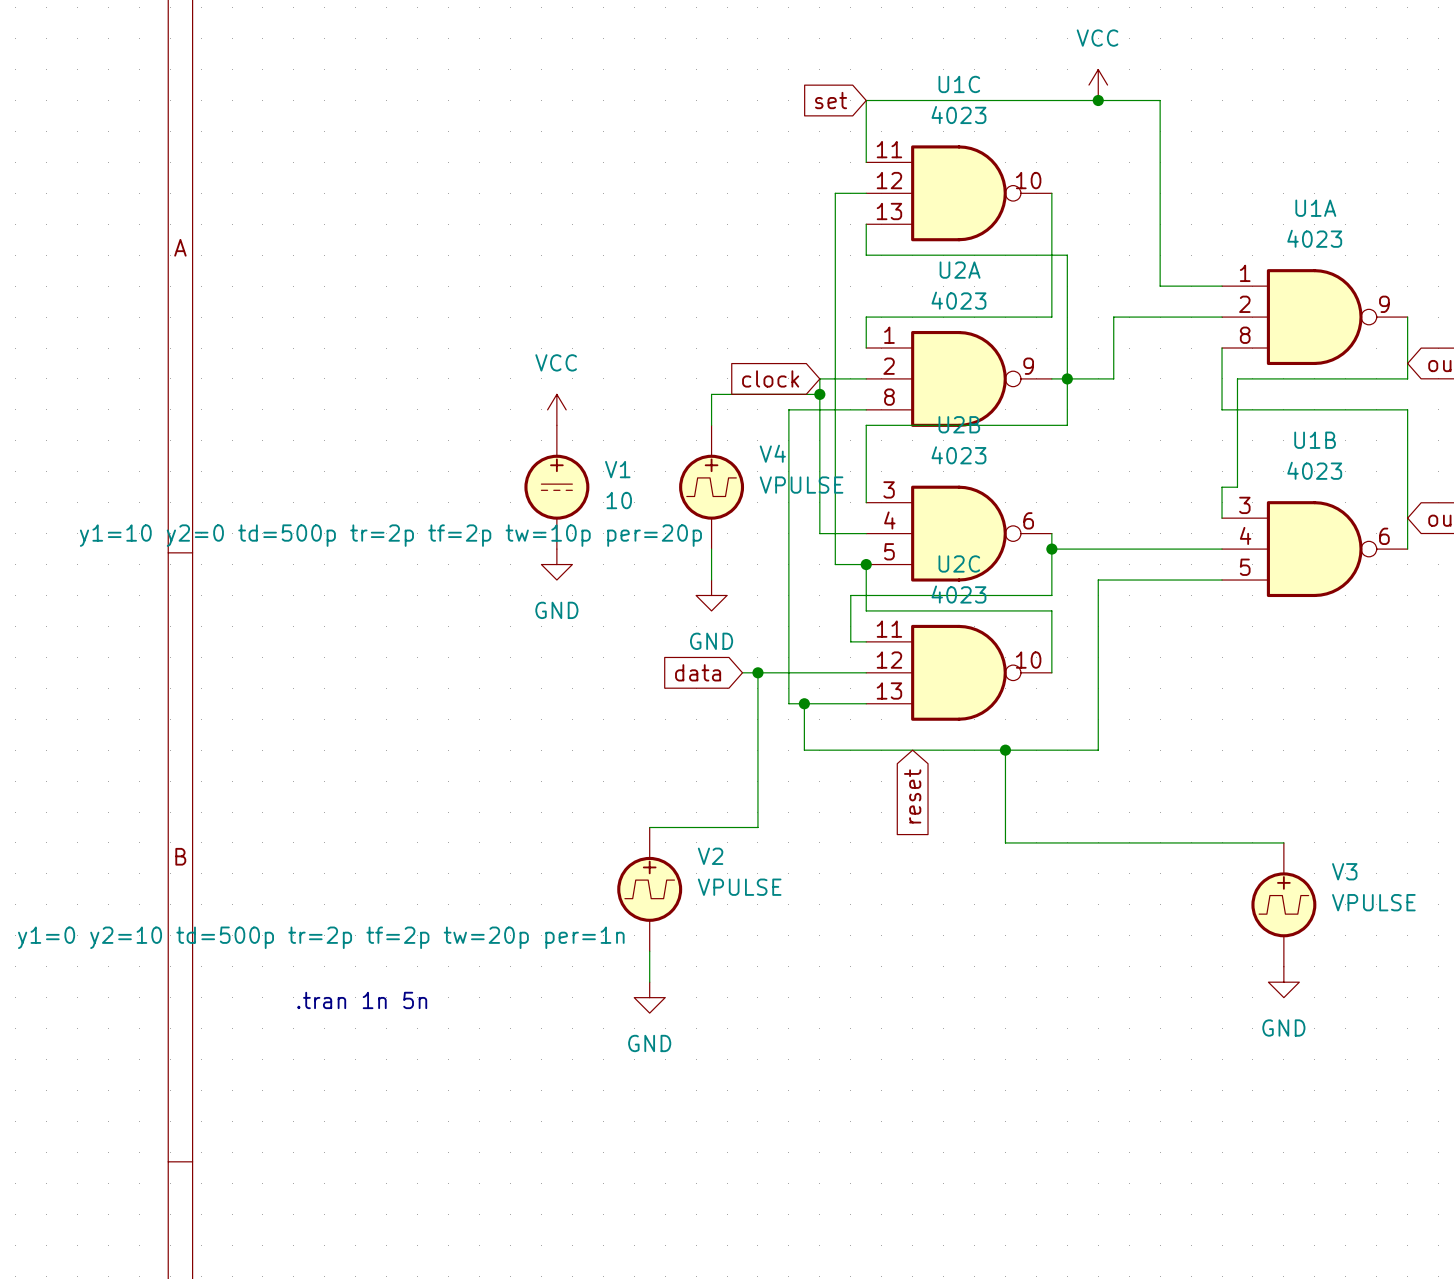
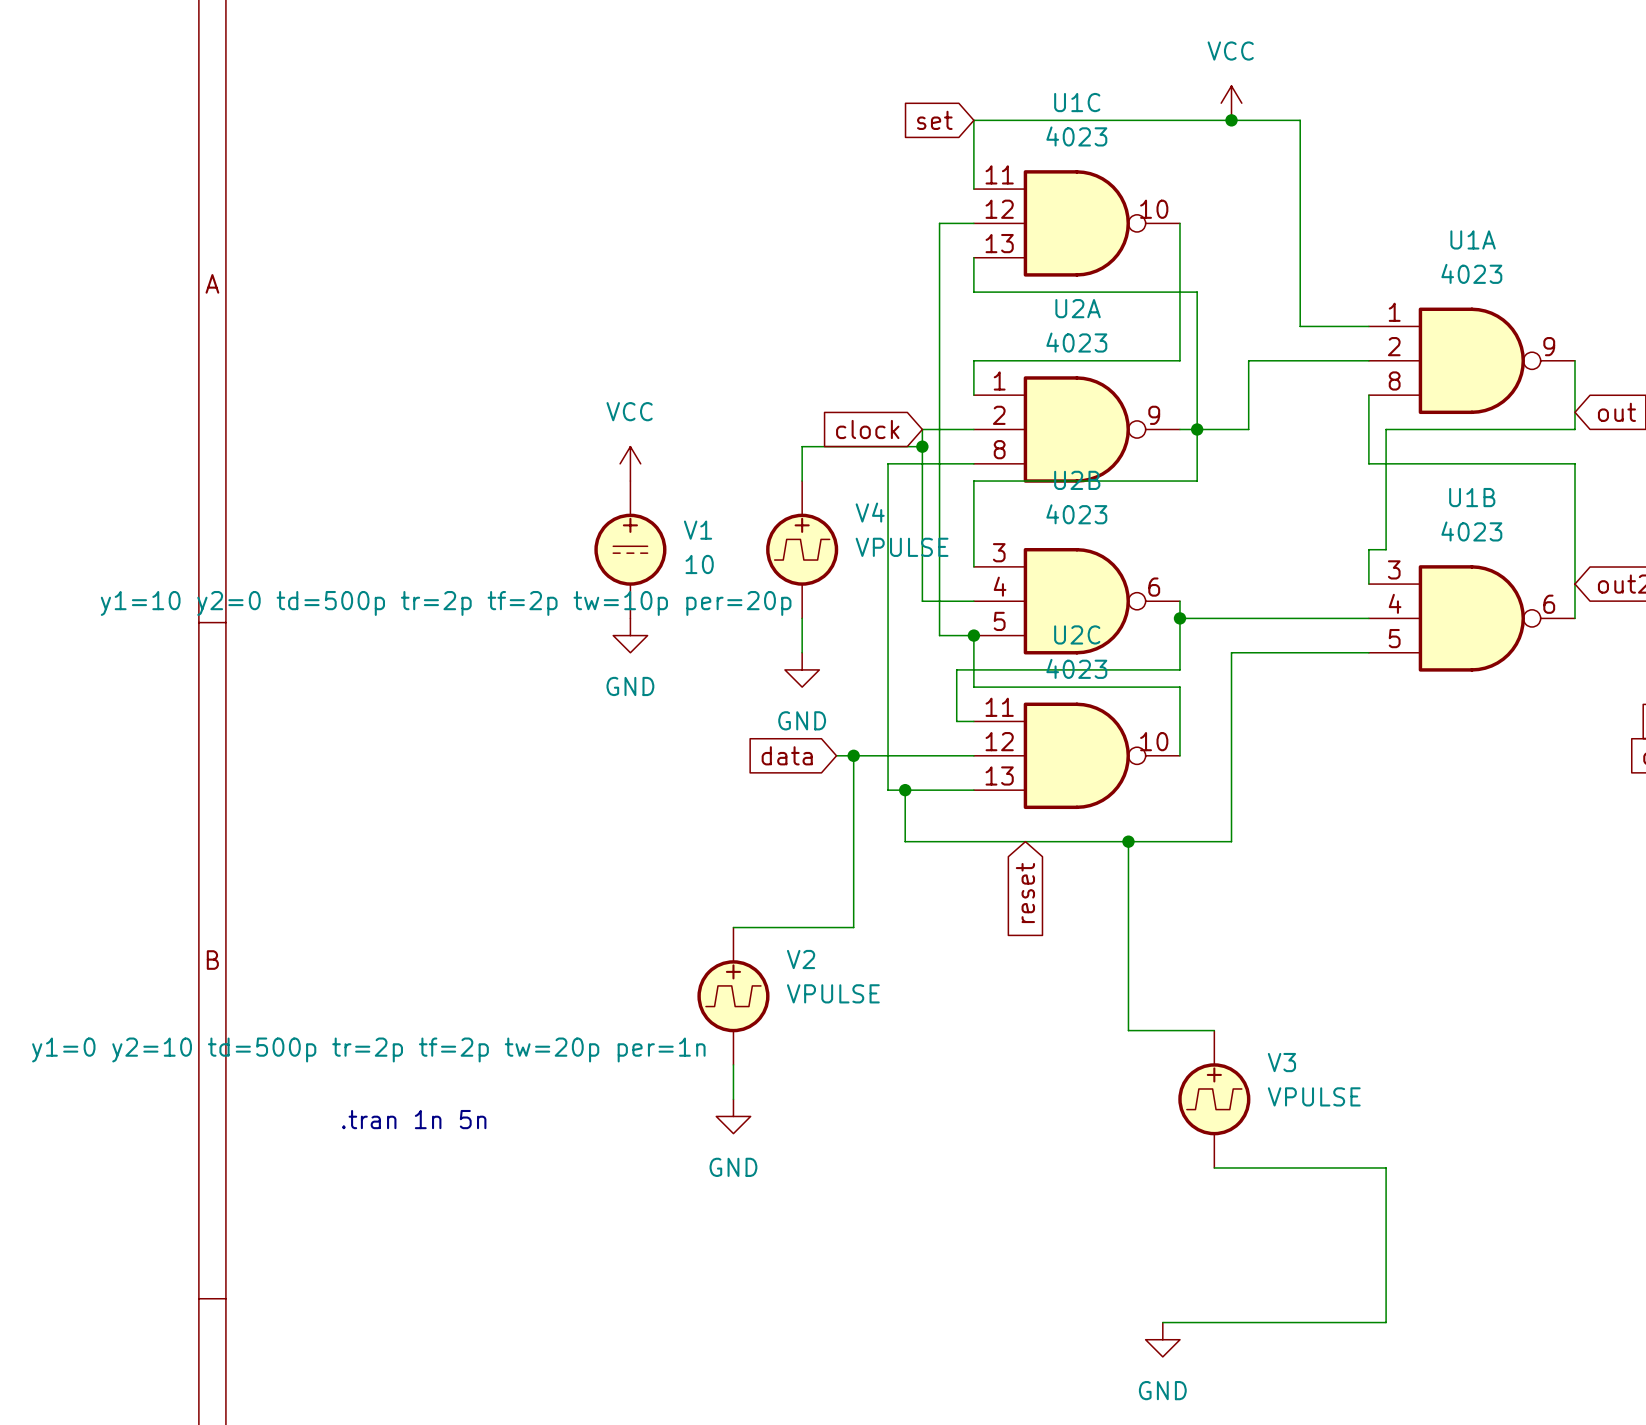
wire: (1005, 842) (1283, 842) -> (1128, 944) (1128, 1030) (1214, 1030)
V3 position: (1283, 904) -> (1214, 1099)
power symbol: GND (1283, 982) -> none
wire: none -> (1214, 1167) (1386, 1167) (1386, 1322) (1162, 1322)
power symbol: none -> GND (1162, 1339)

